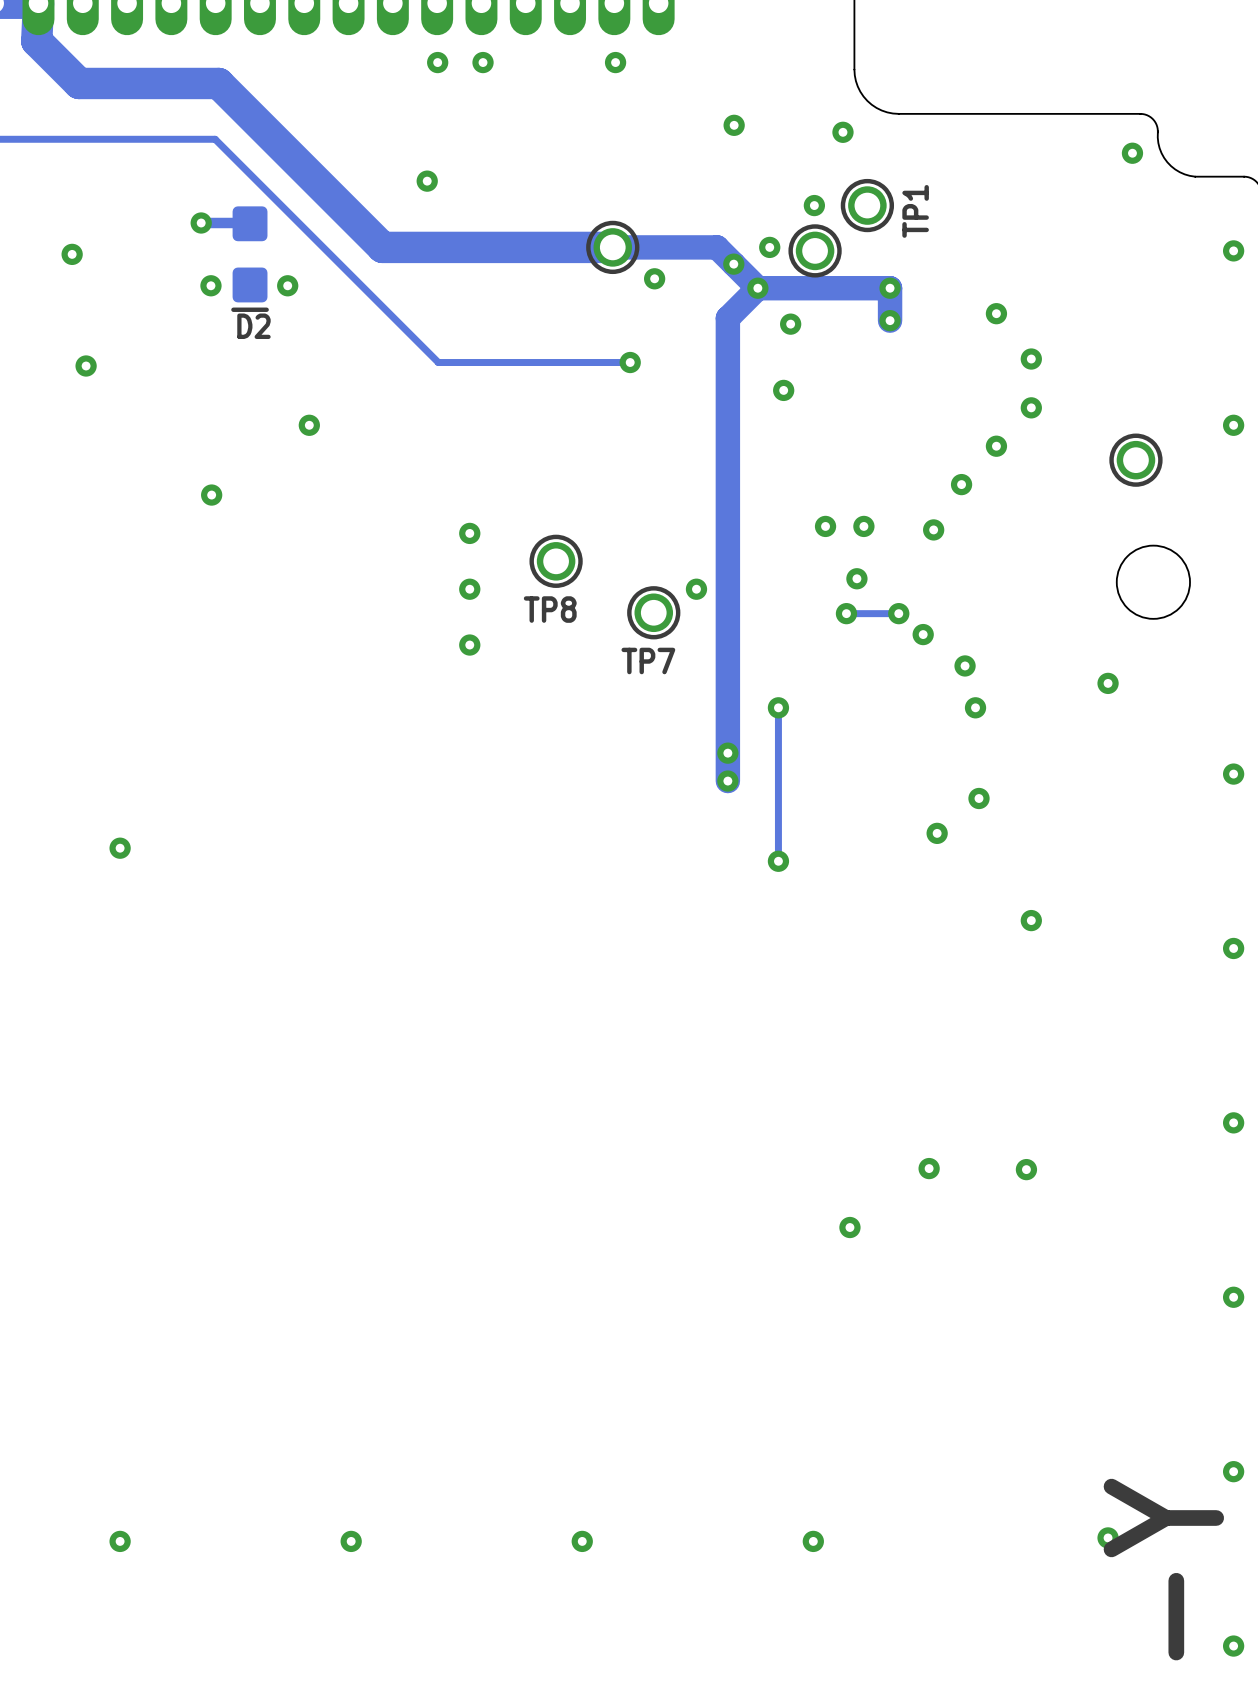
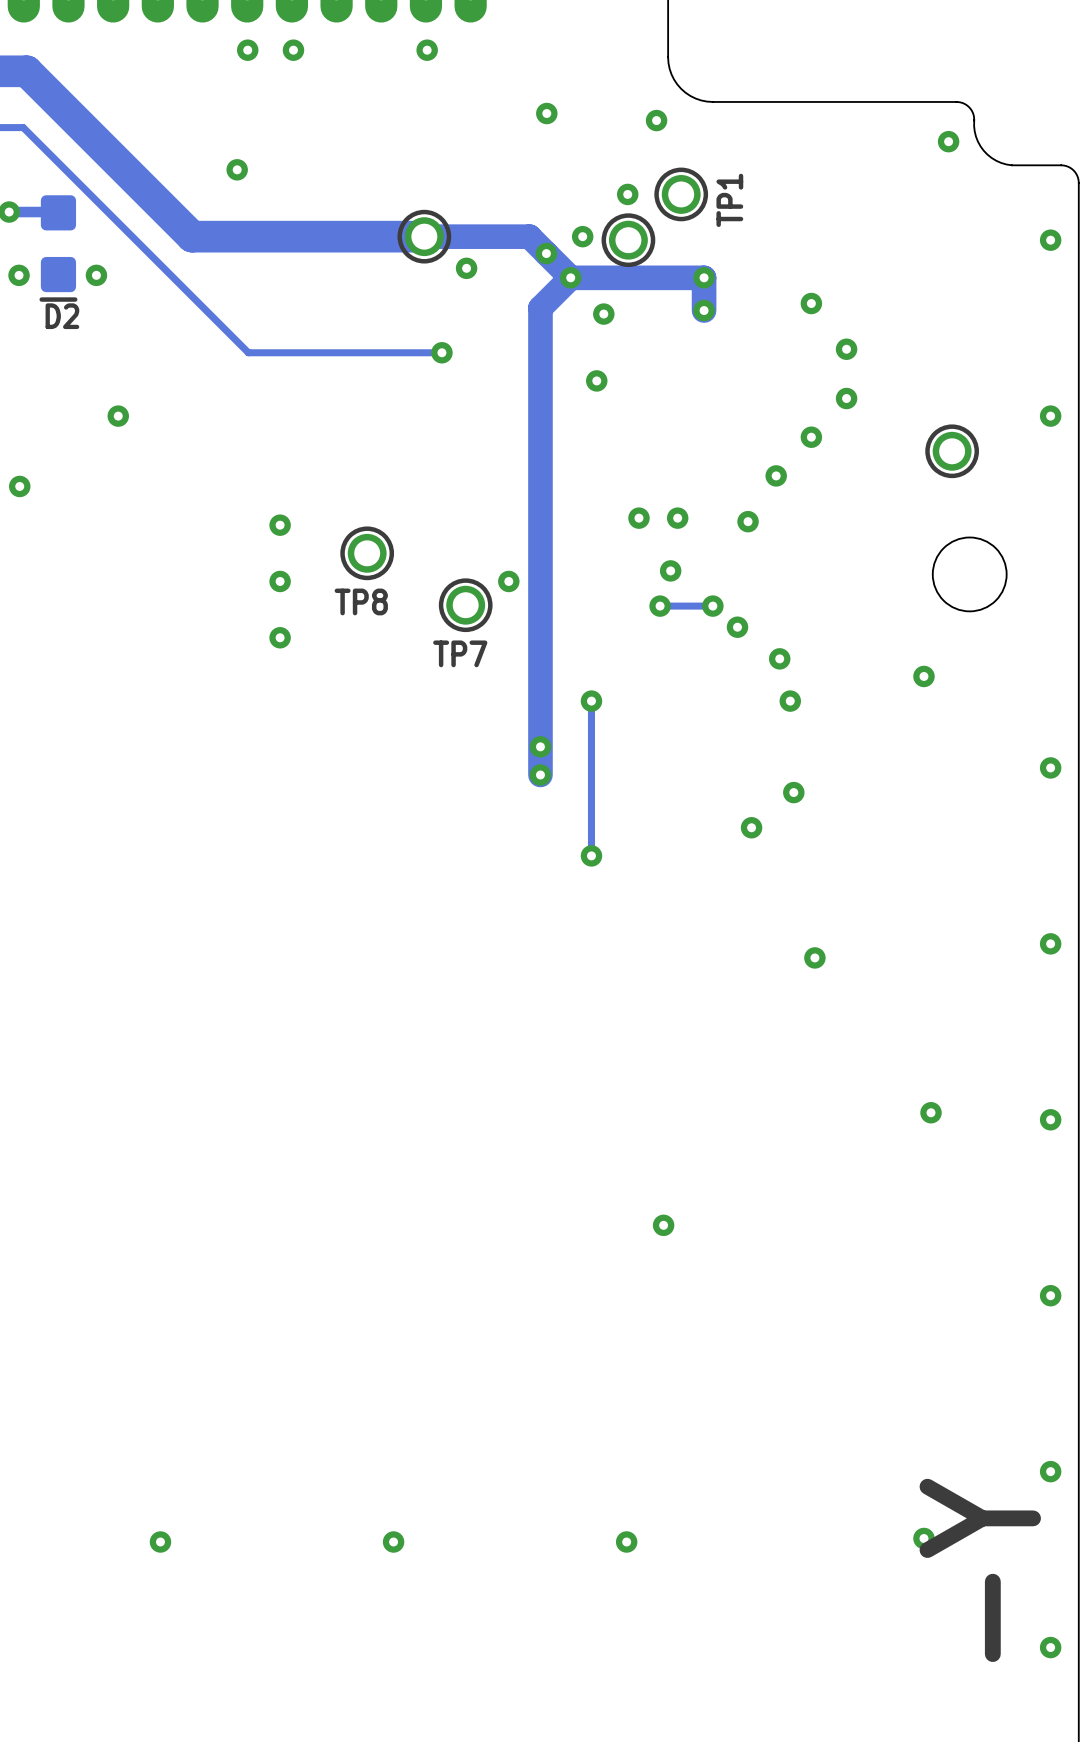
via position: (1031, 920) -> (814, 957)
via: none -> (931, 1112)
via: (929, 1168) -> none
via: (1026, 1169) -> none

